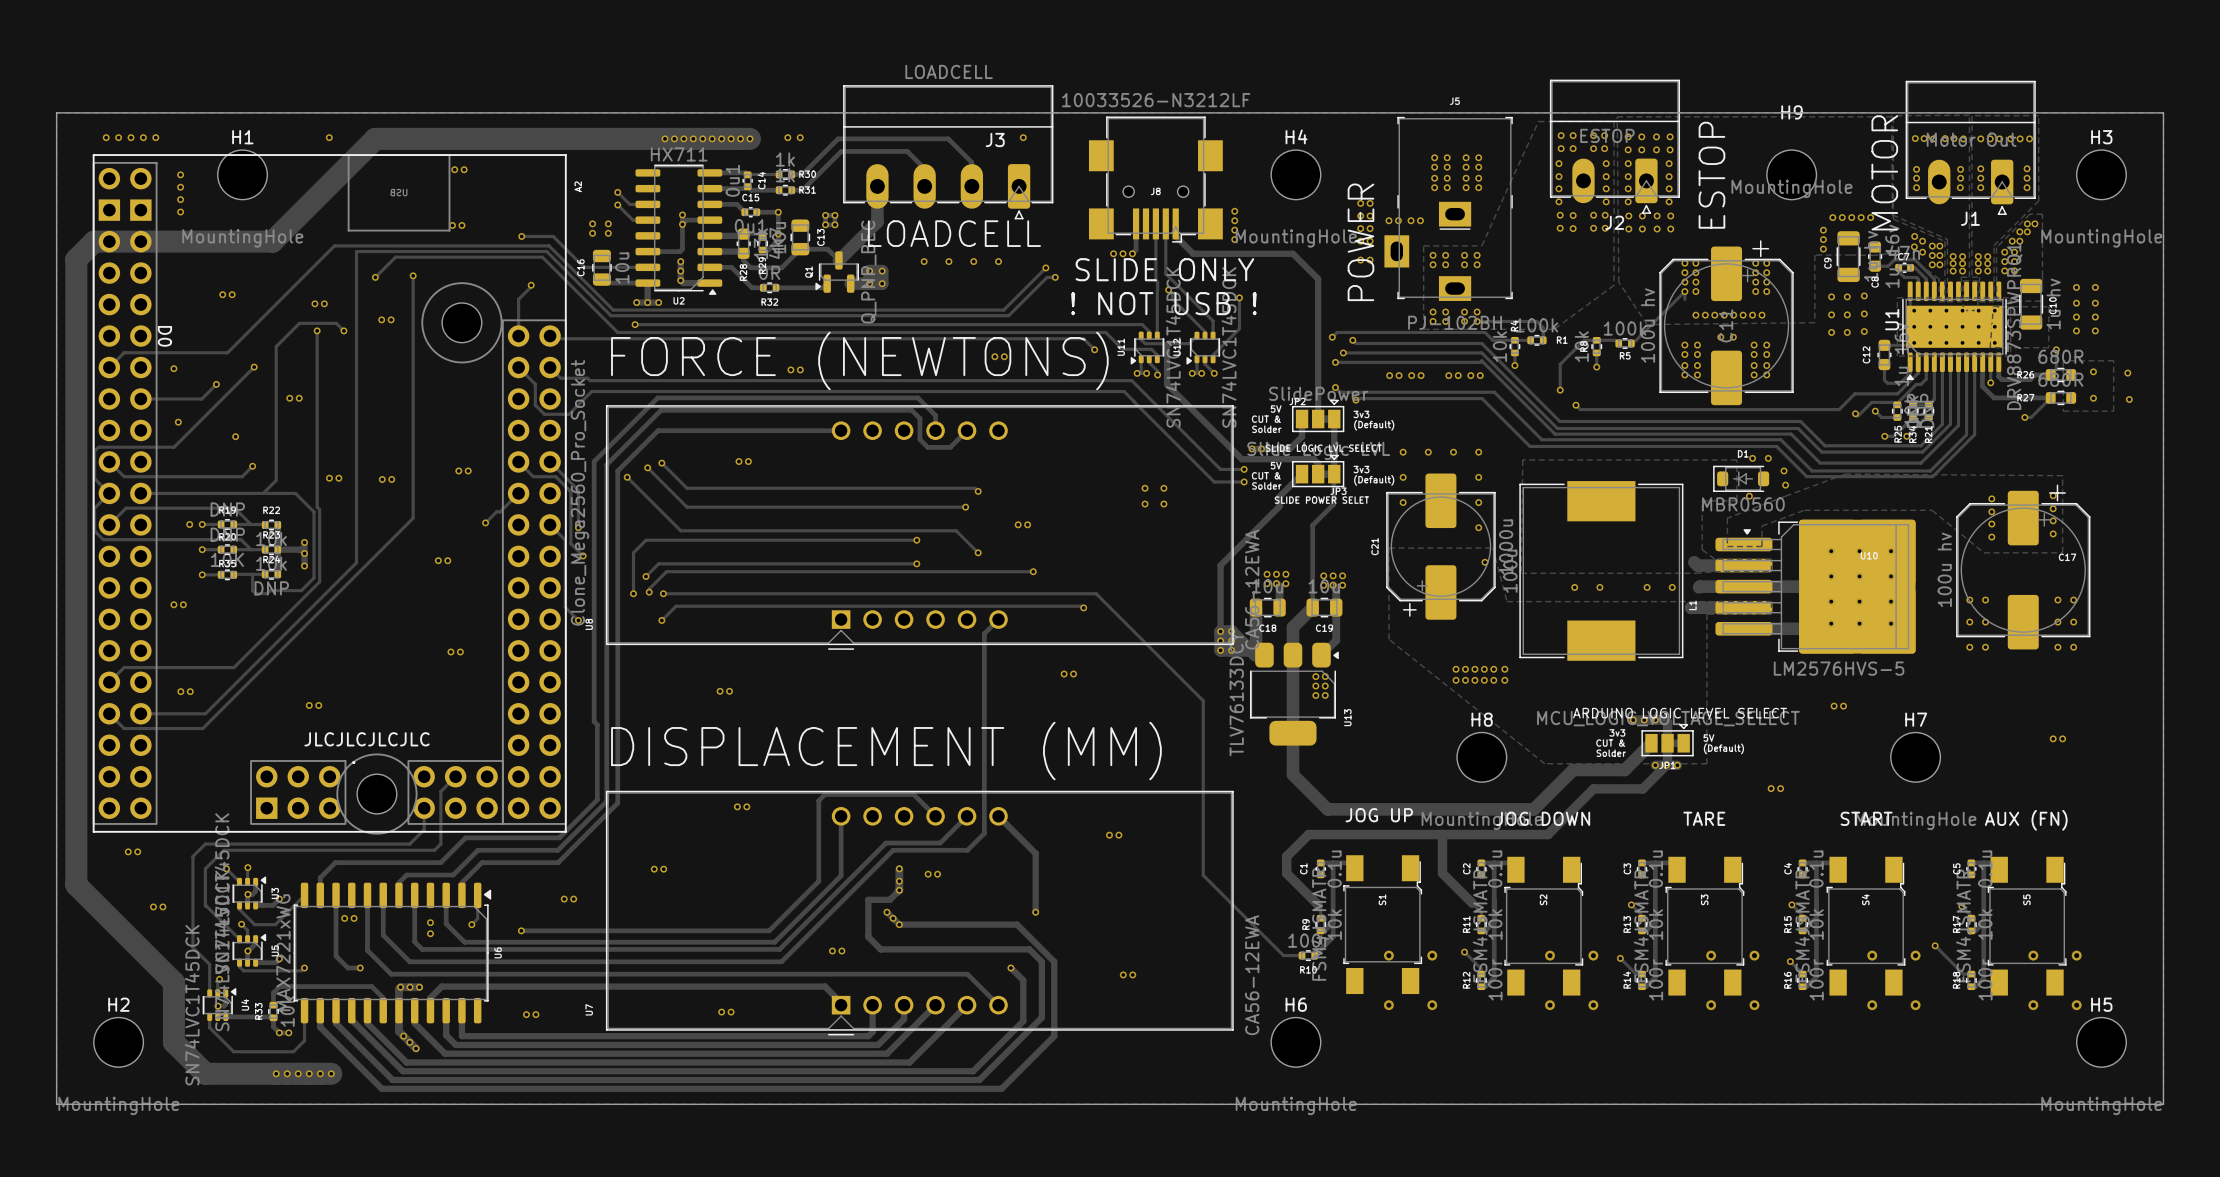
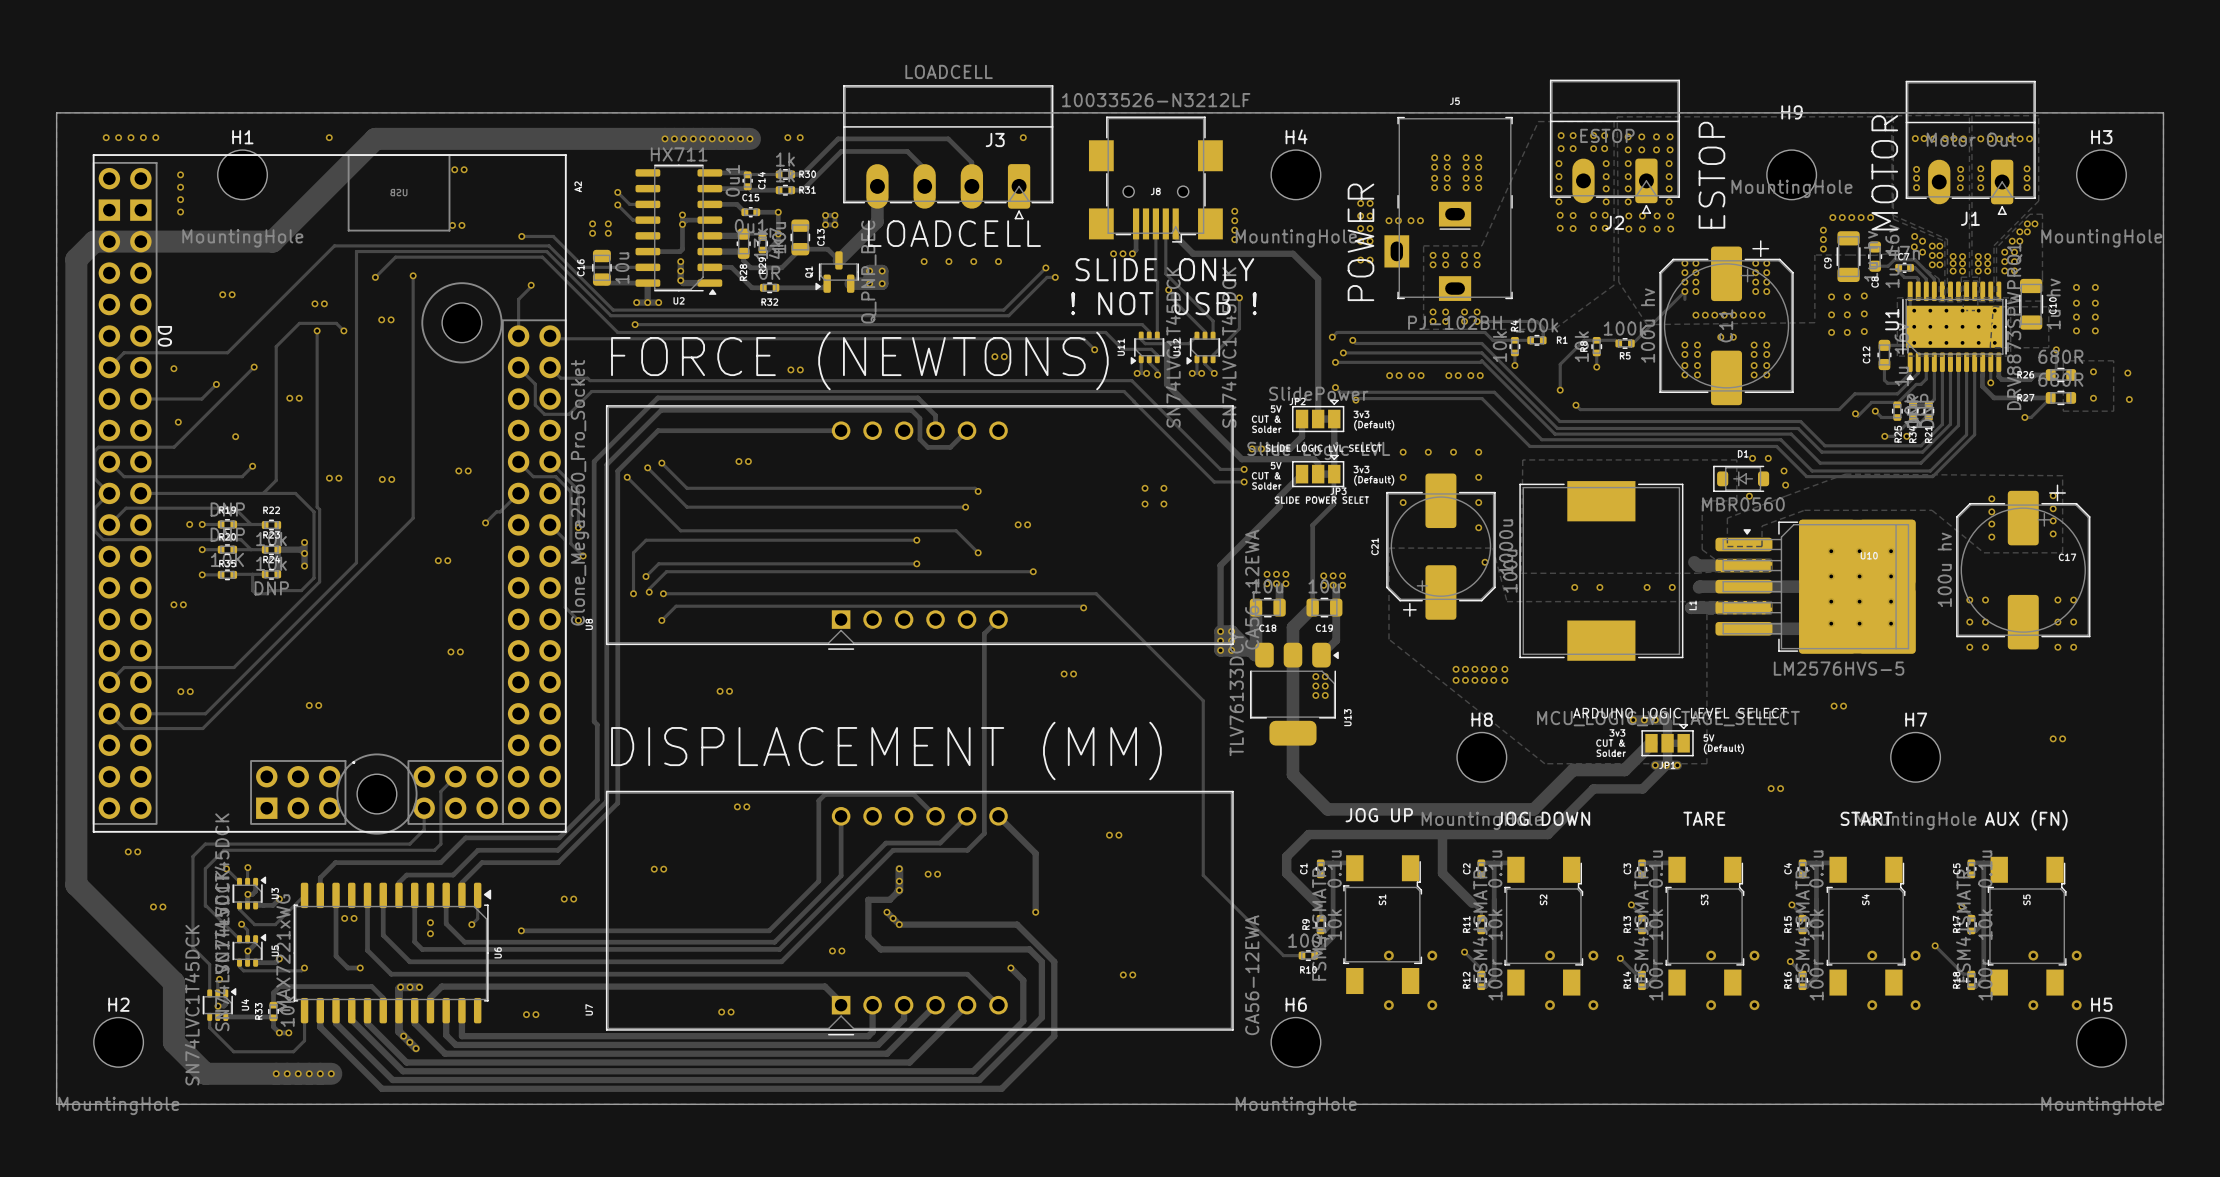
text: JLCJLCJLCJLC (367, 739) -> none

